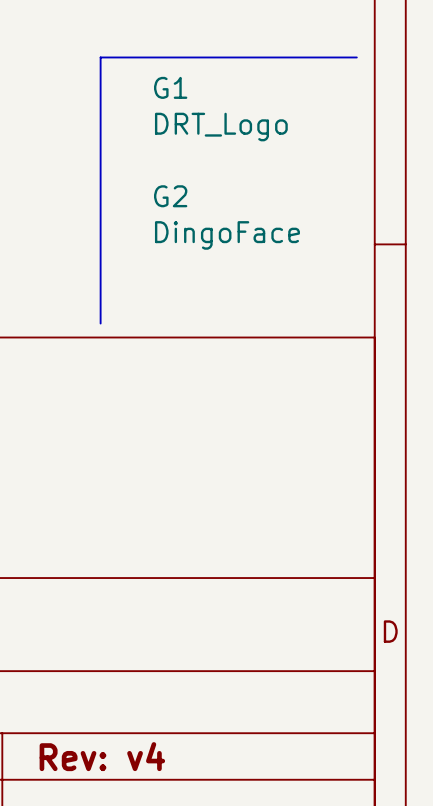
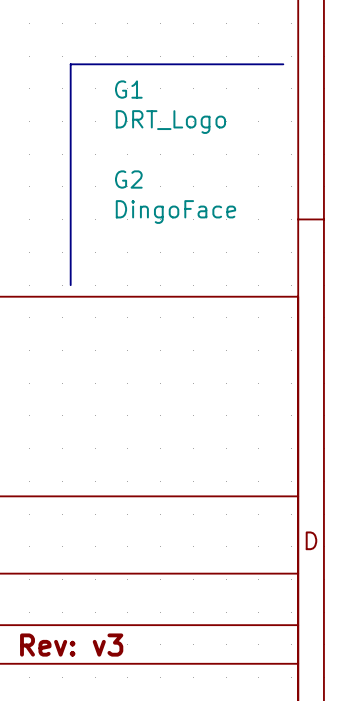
title block: Rev: v4 (102, 756) -> Rev: v3 (71, 645)

